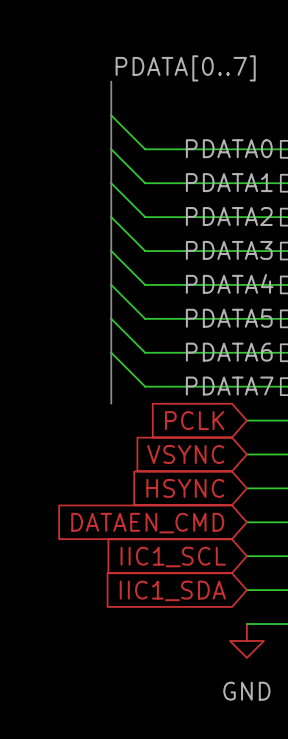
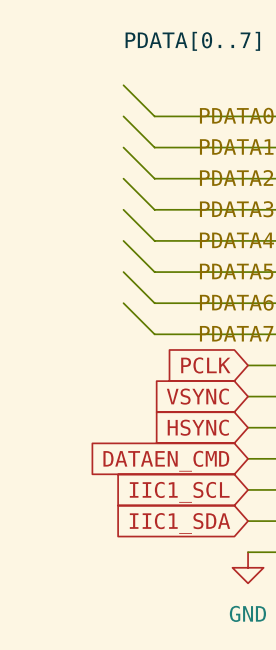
bus: (111, 81) (111, 403) -> none

